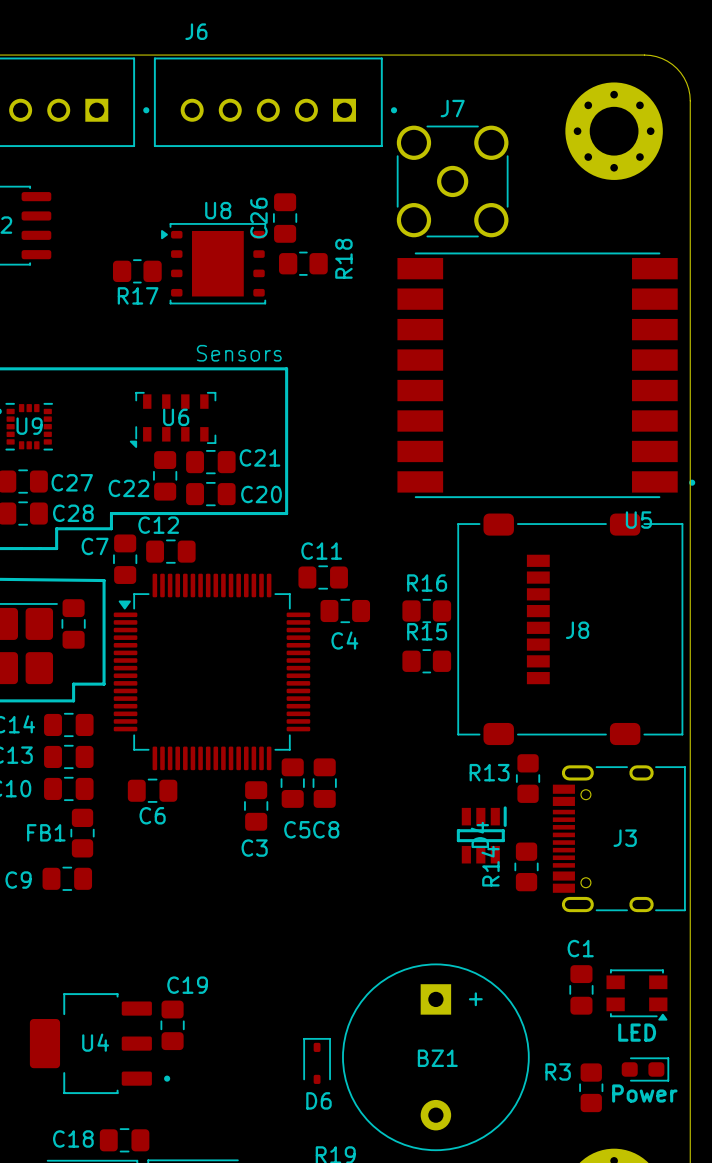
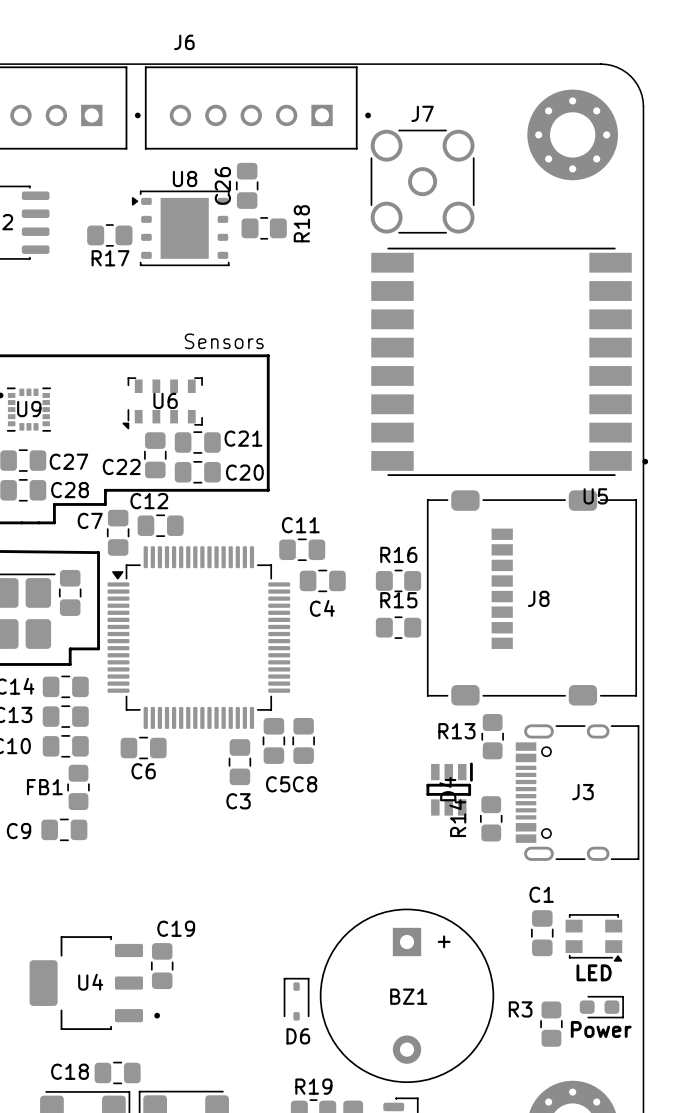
C26 position: (285, 218) -> (247, 185)
U8 position: (213, 263) -> (180, 228)
R18 position: (303, 263) -> (264, 228)
R17 position: (137, 271) -> (109, 235)

